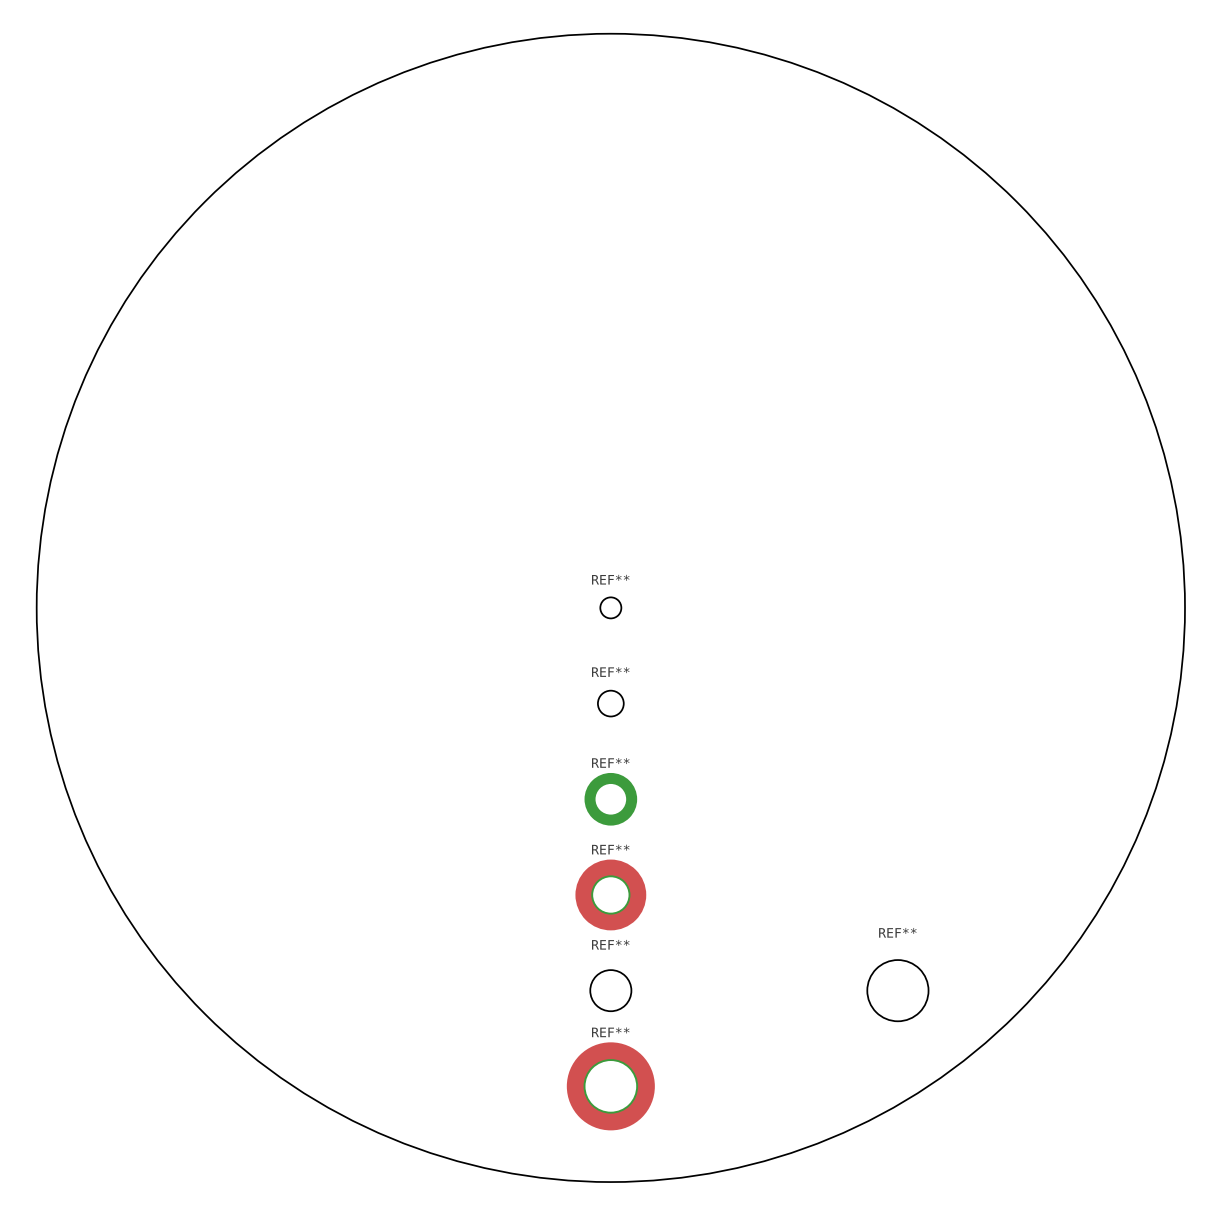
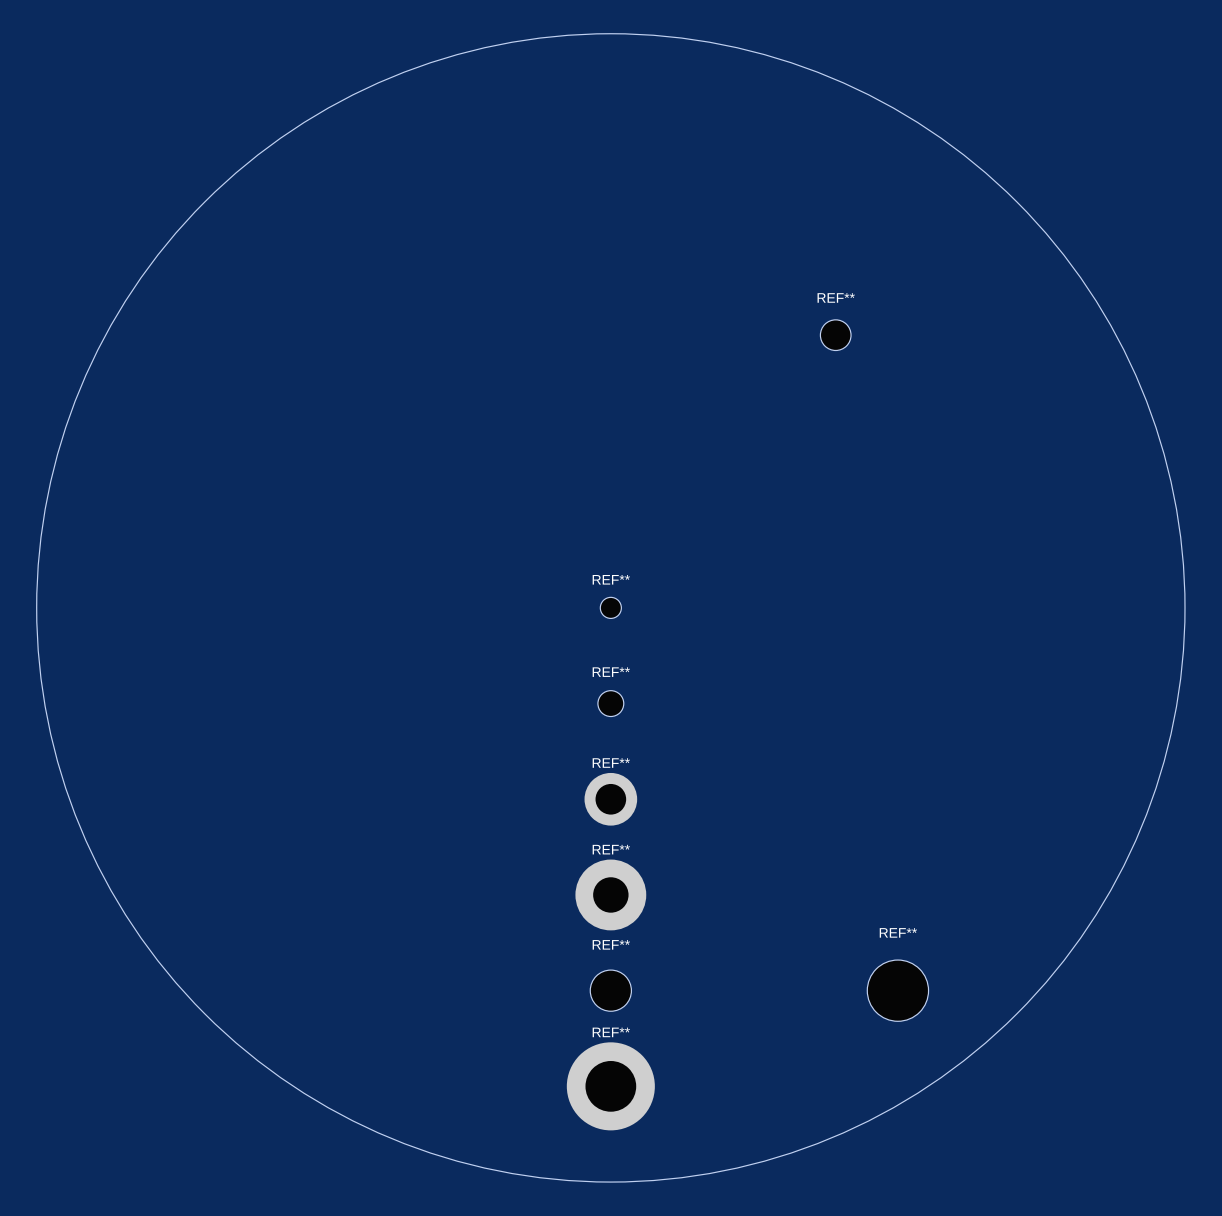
REF**: none -> (835, 335)

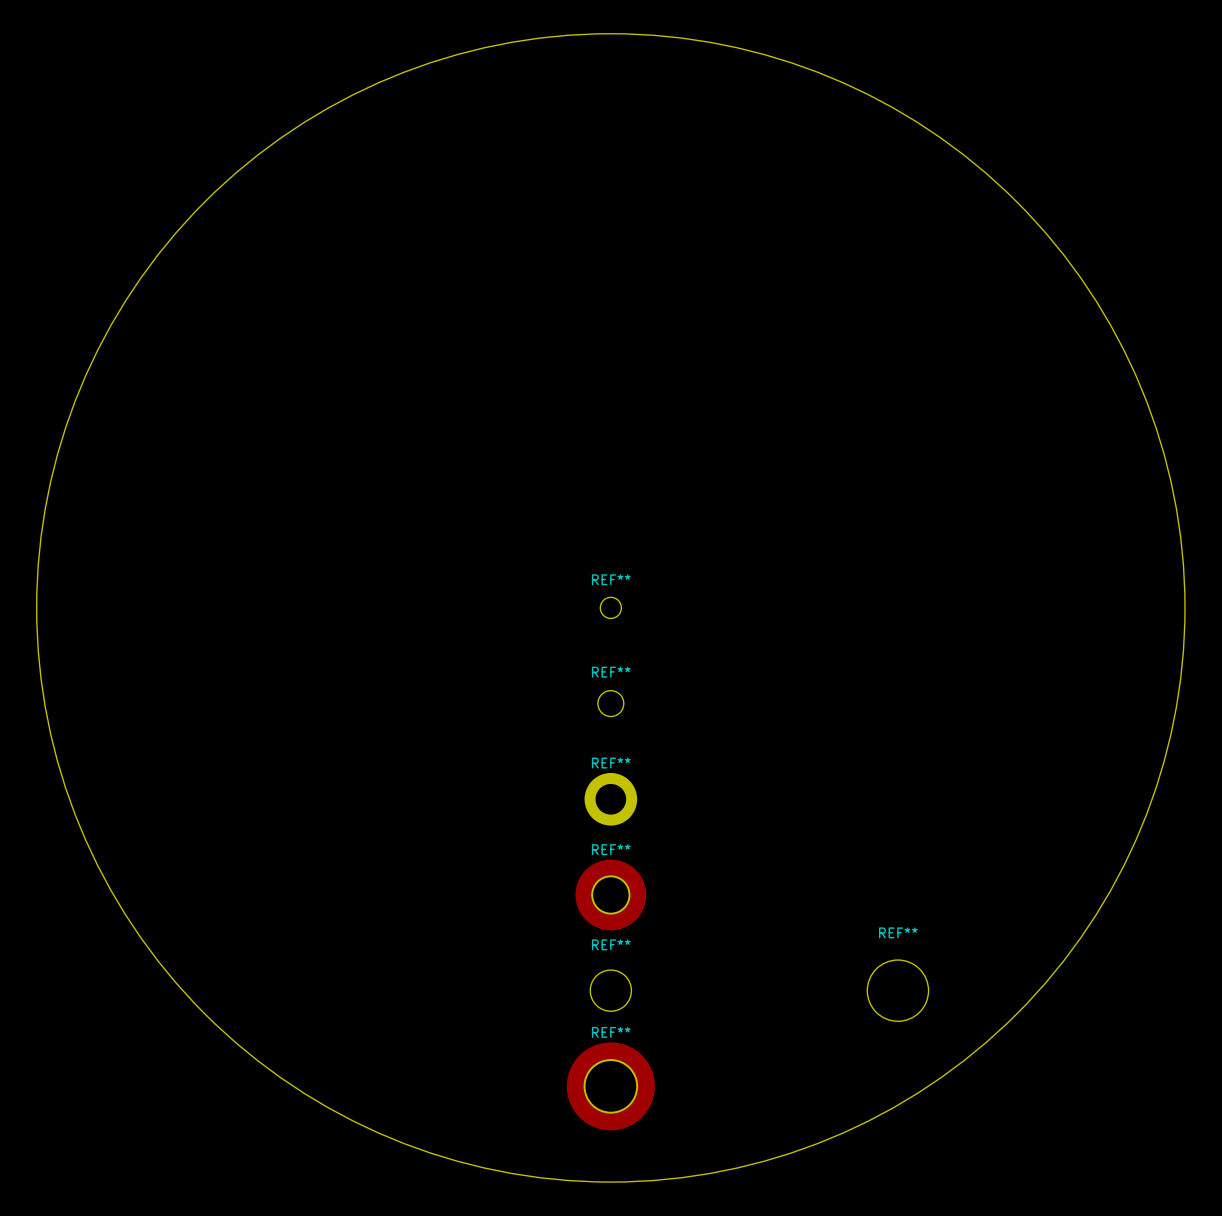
REF**: (835, 335) -> none

